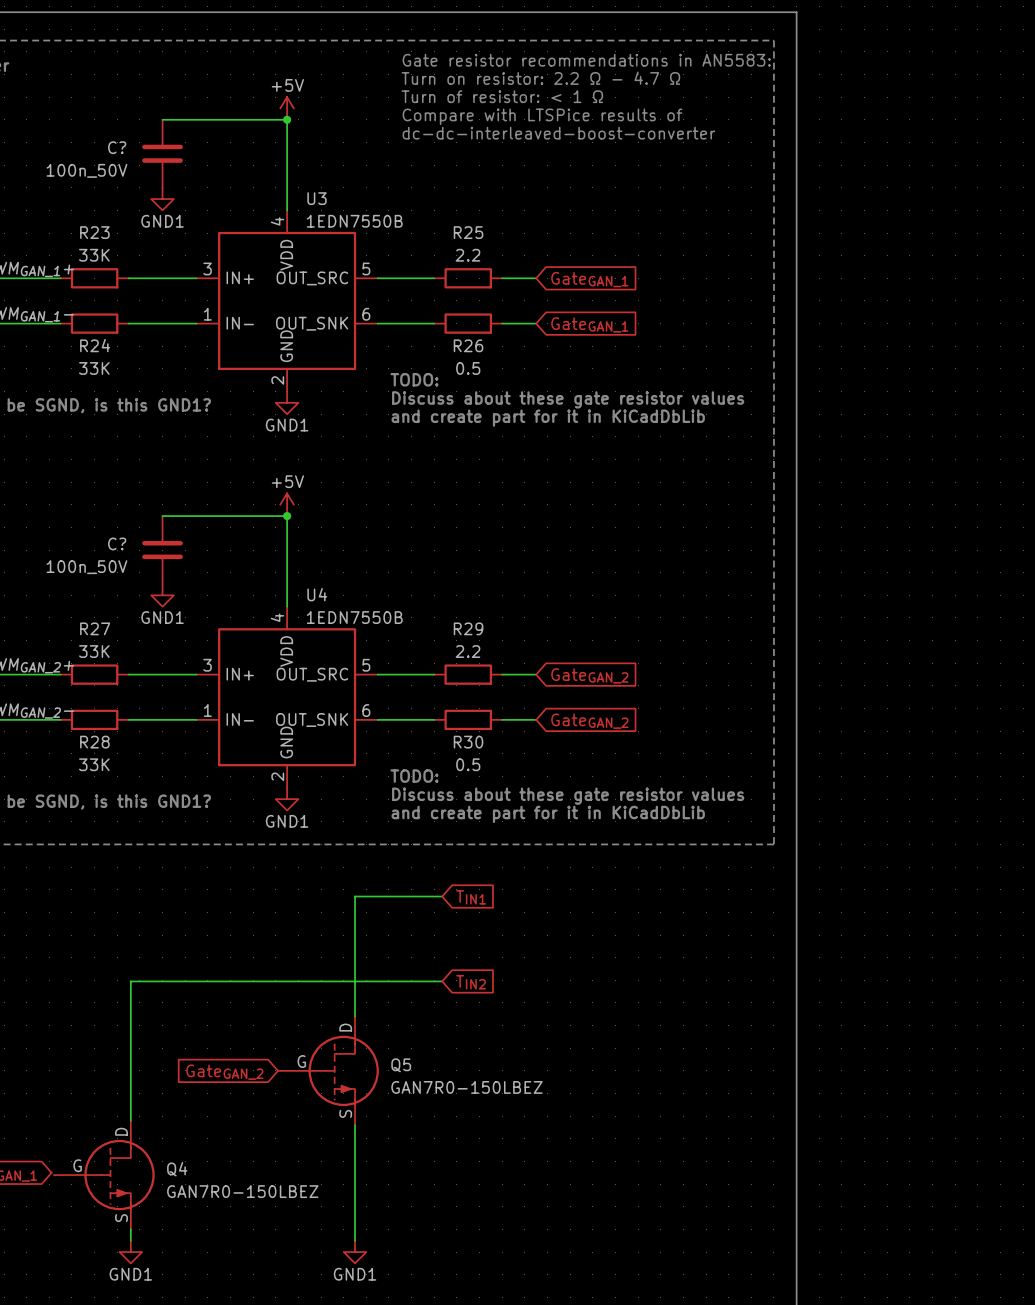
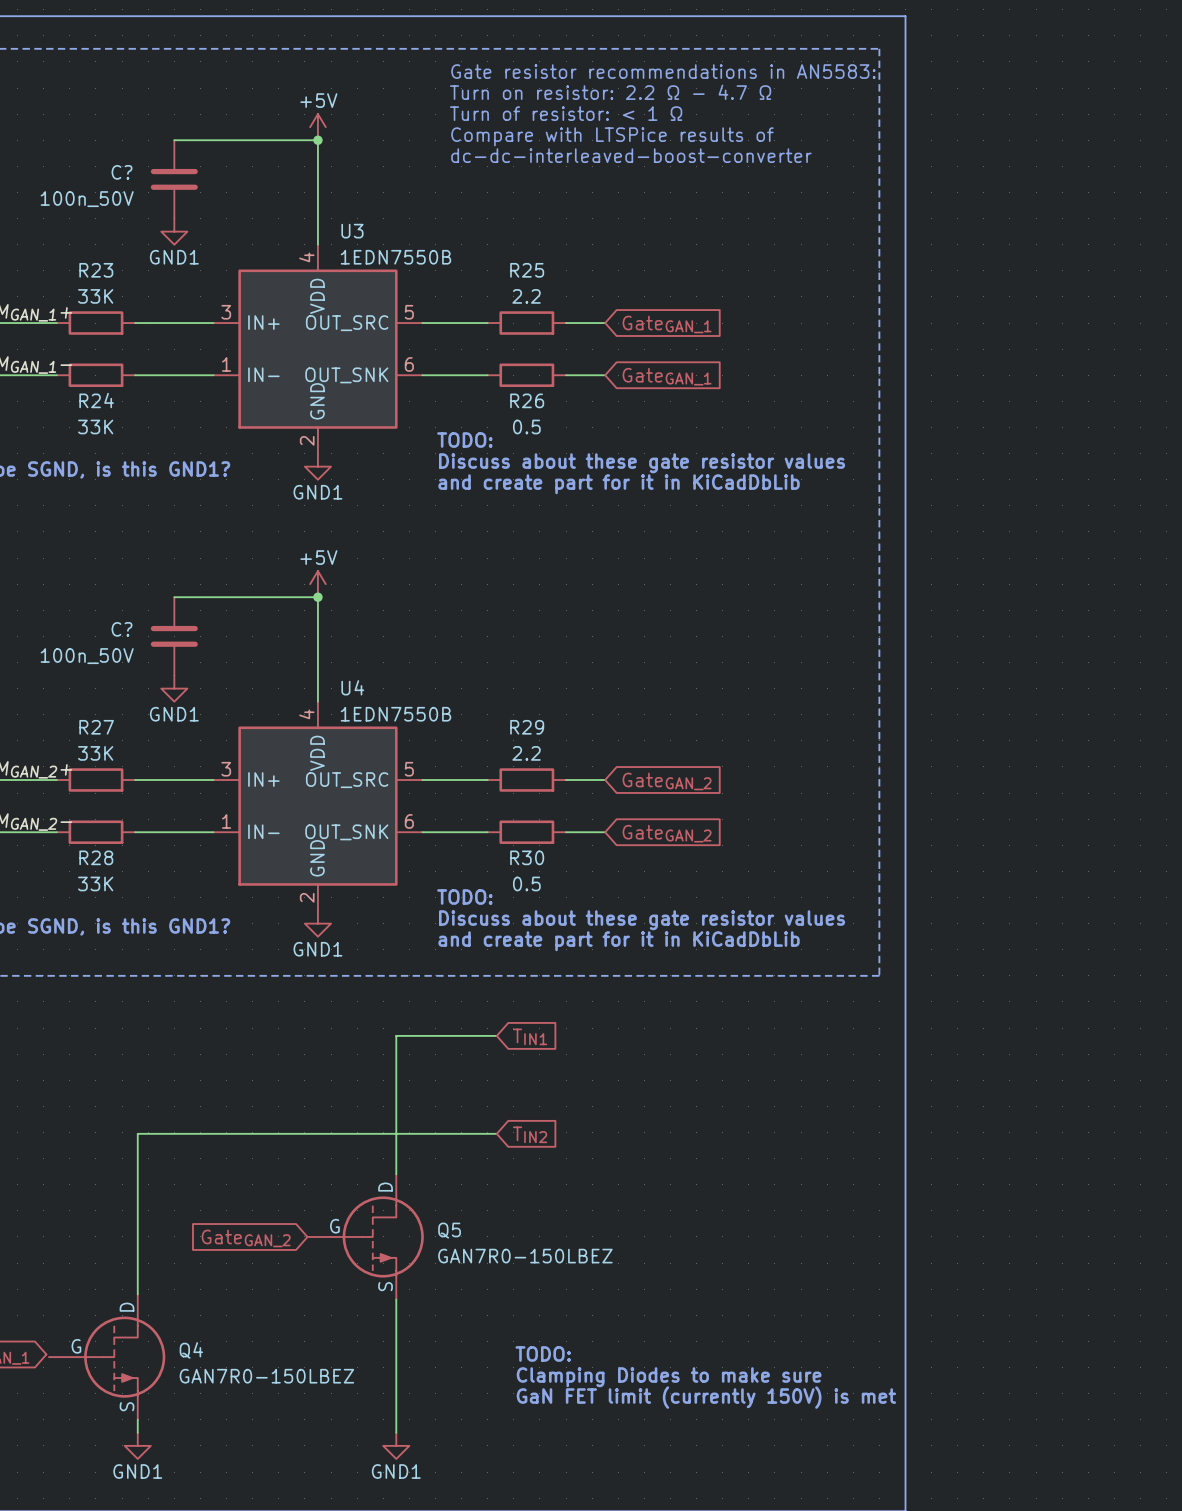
text: none -> TODO: (543, 1353)
text: none -> Clamping Diodes to make sure (669, 1377)
text: none -> GaN FET limit (currently 150V) is met (706, 1397)

